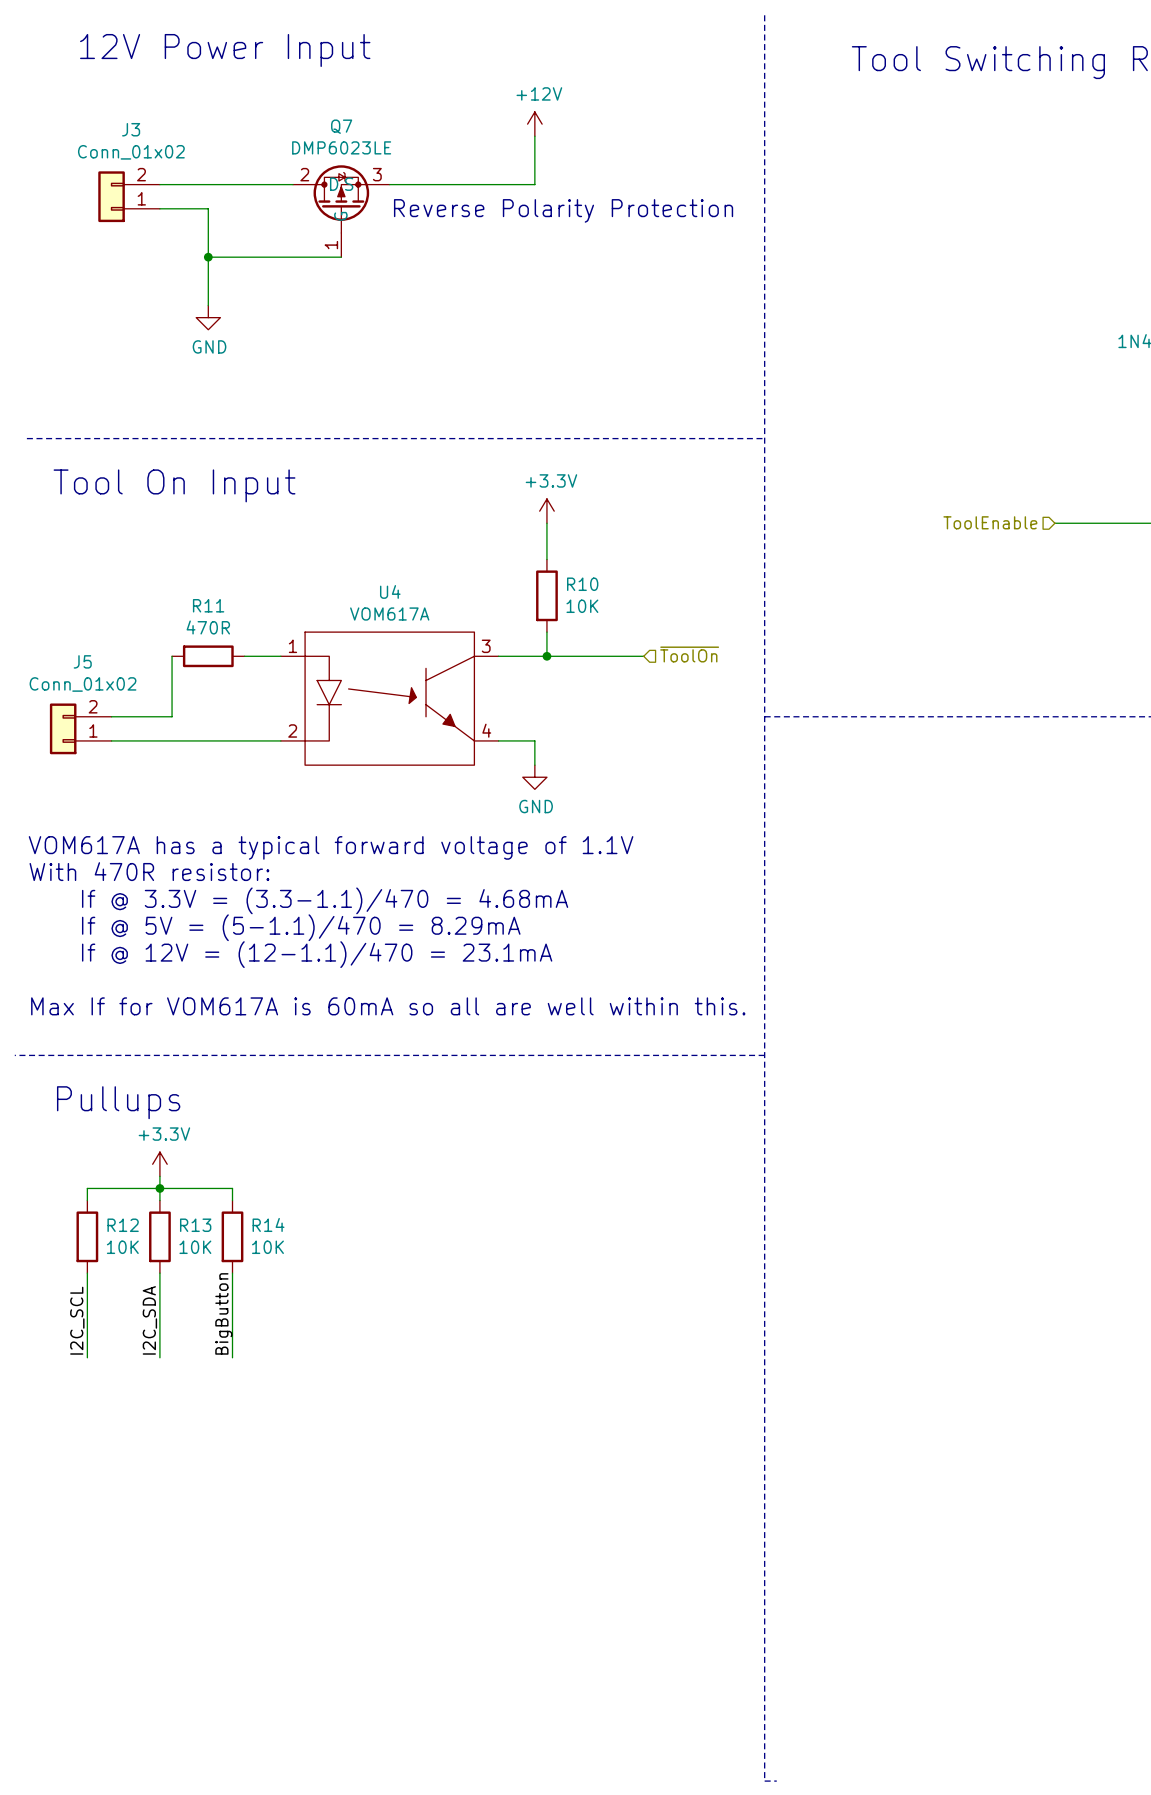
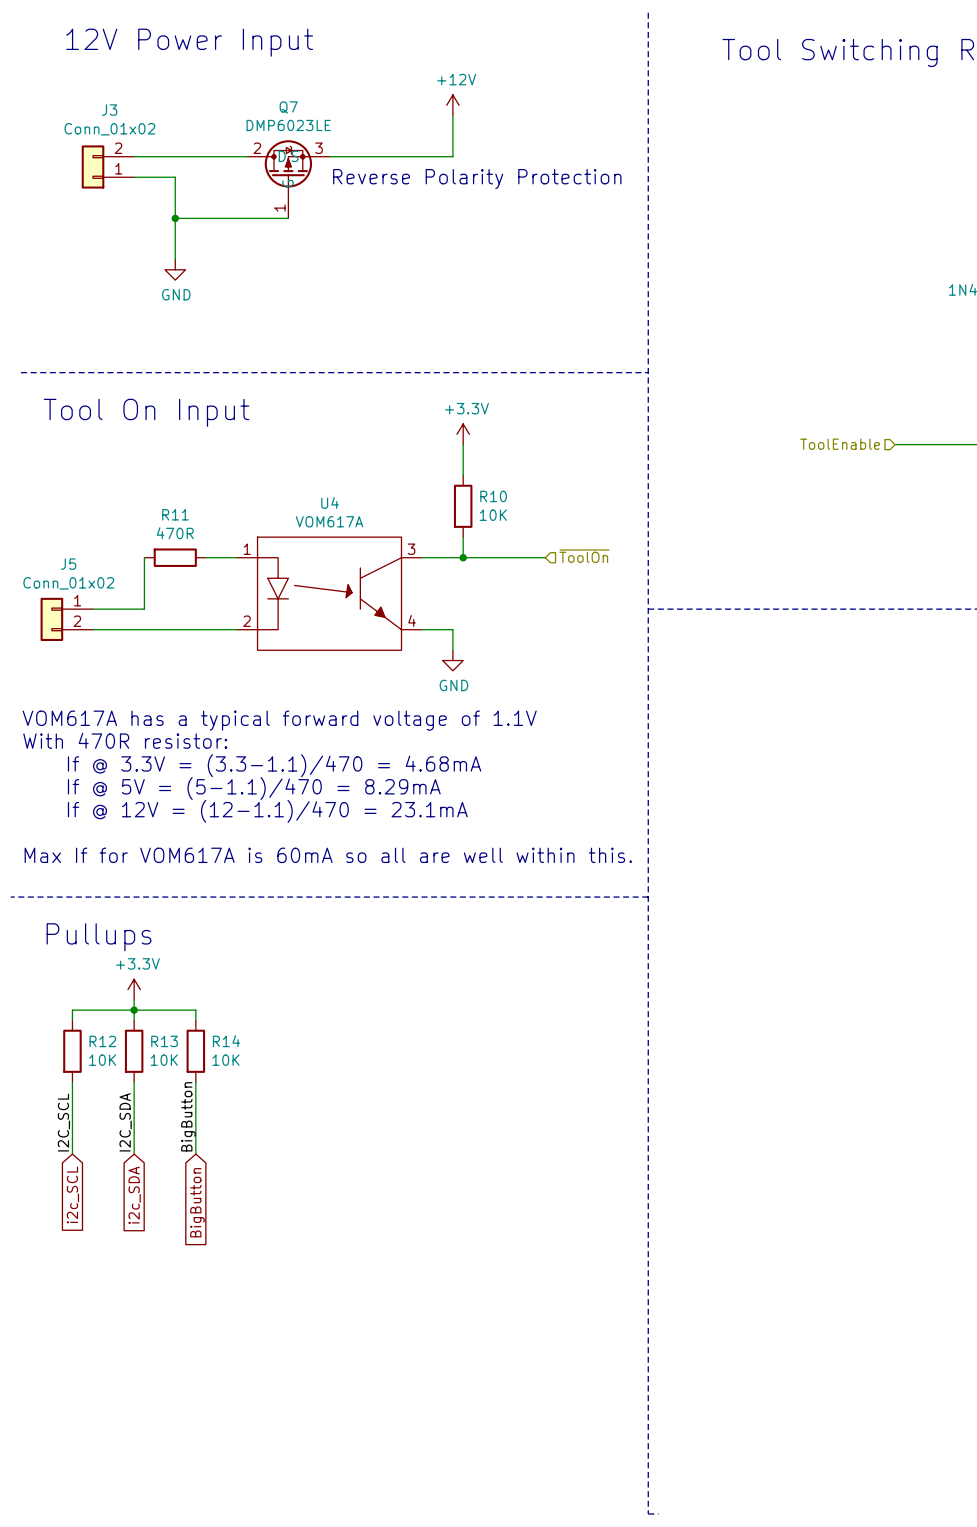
J5 flip: as is (63, 728) -> up-down (51, 619)
global label: none -> i2c_SCL (72, 1195)
global label: none -> i2c_SDA (134, 1195)
global label: none -> BigButton (197, 1202)

